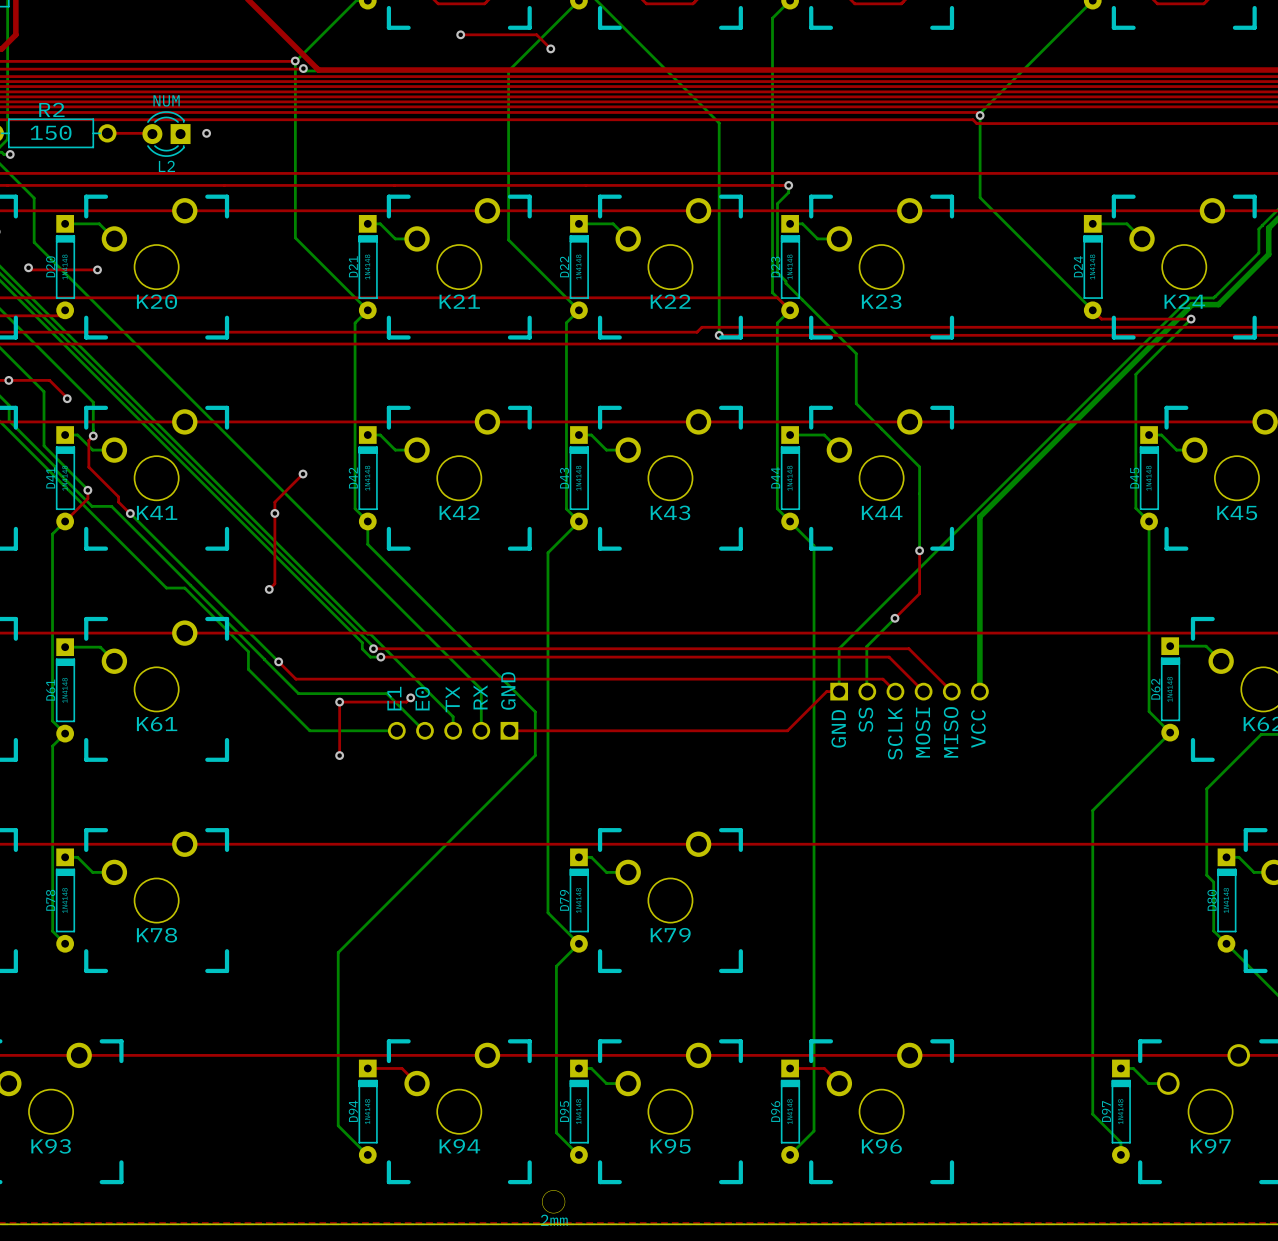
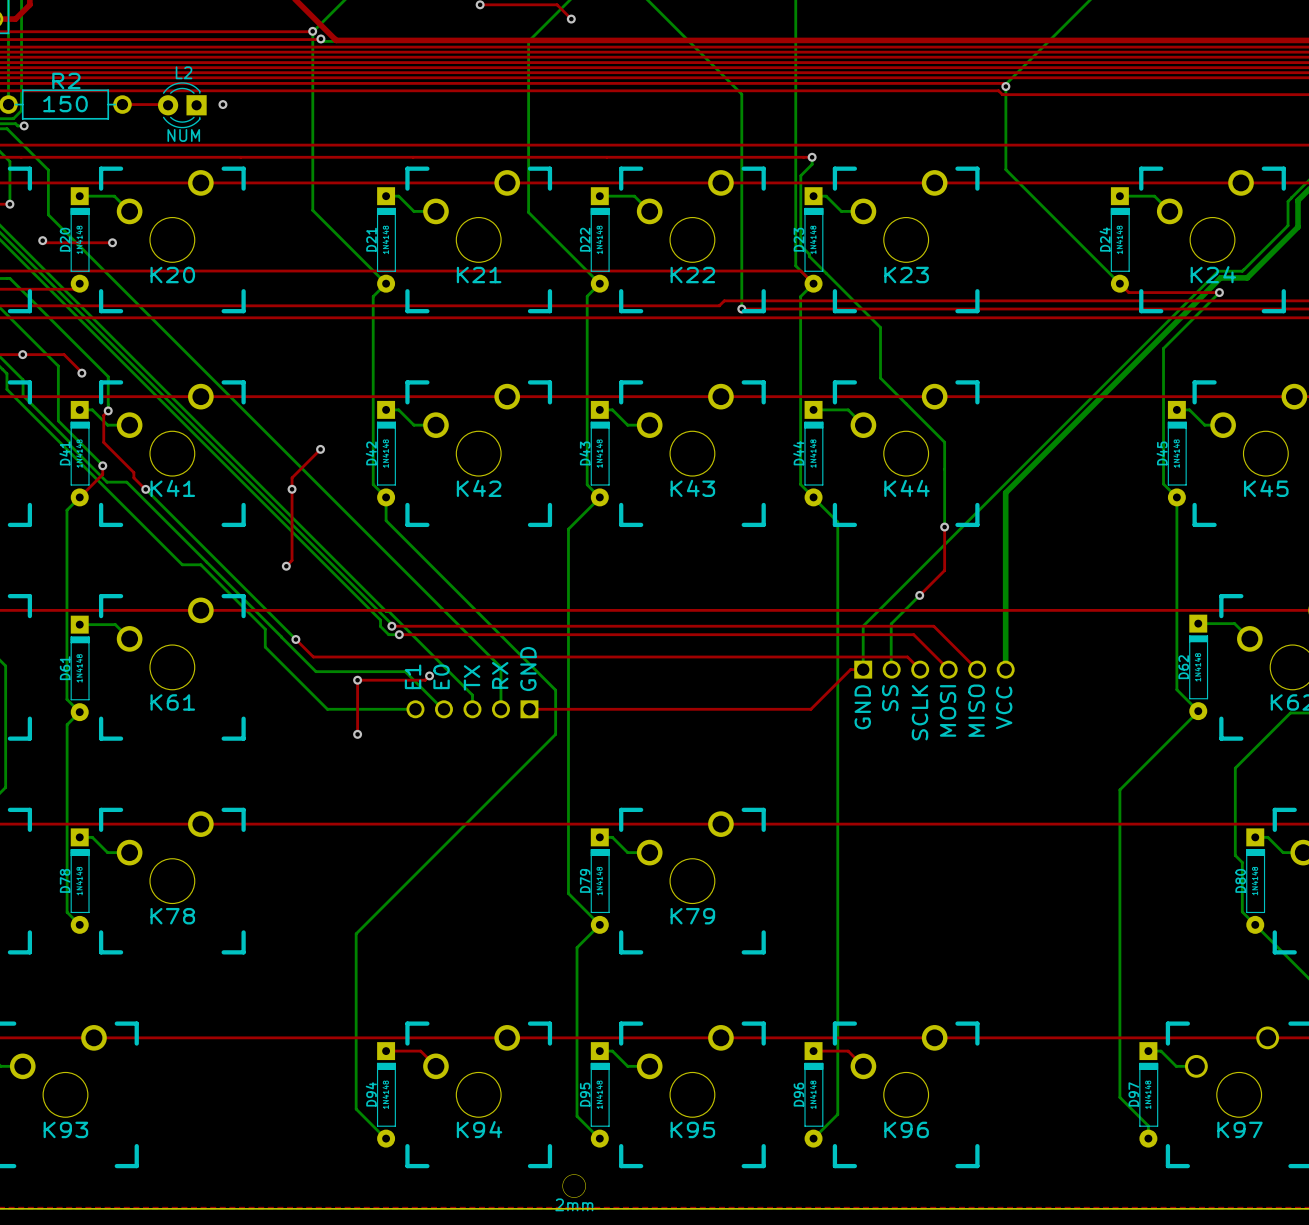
L2 value position: NUM (166, 100) -> NUM (183, 135)
L2 name position: L2 (166, 166) -> L2 (184, 72)

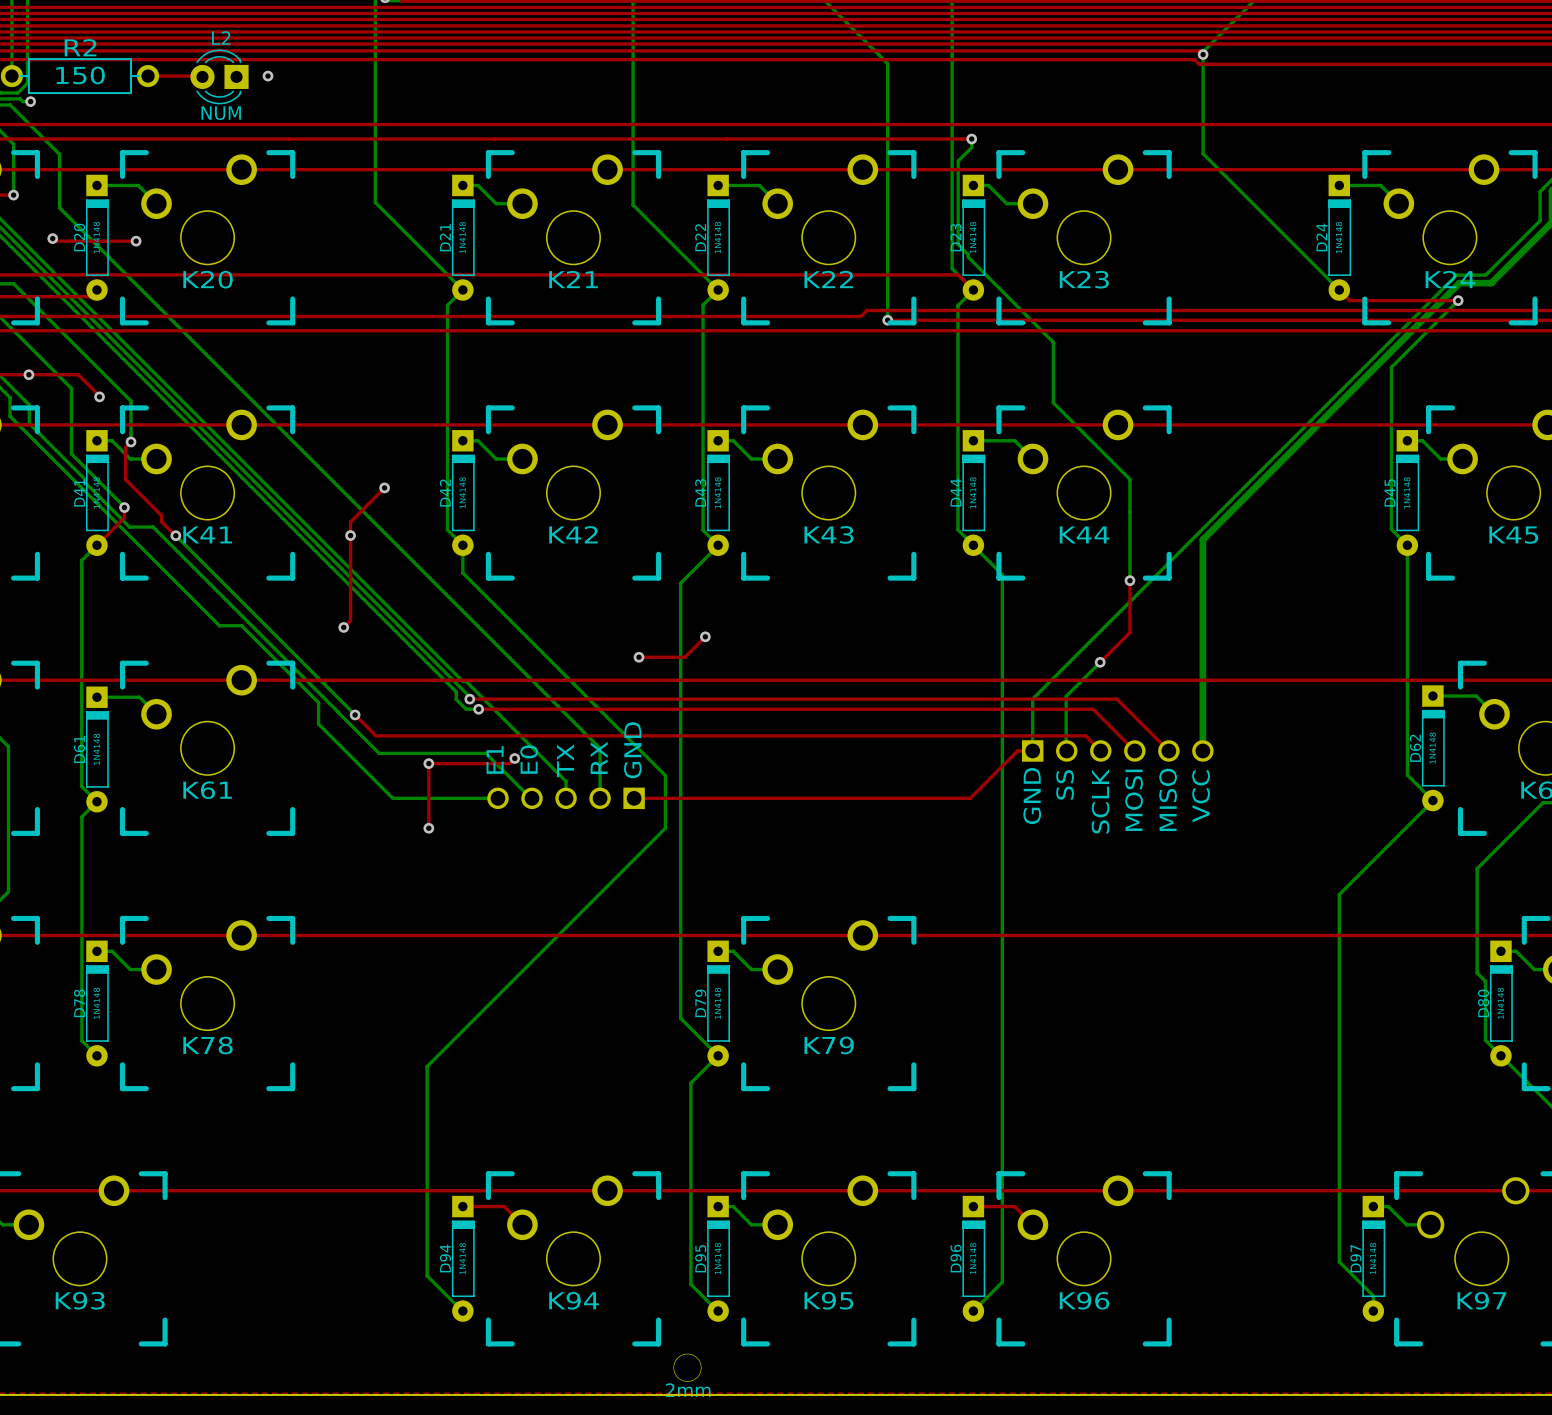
top track: none -> (705, 636) (684, 657) (639, 657)
via: none -> (705, 636)
via: none -> (639, 657)

